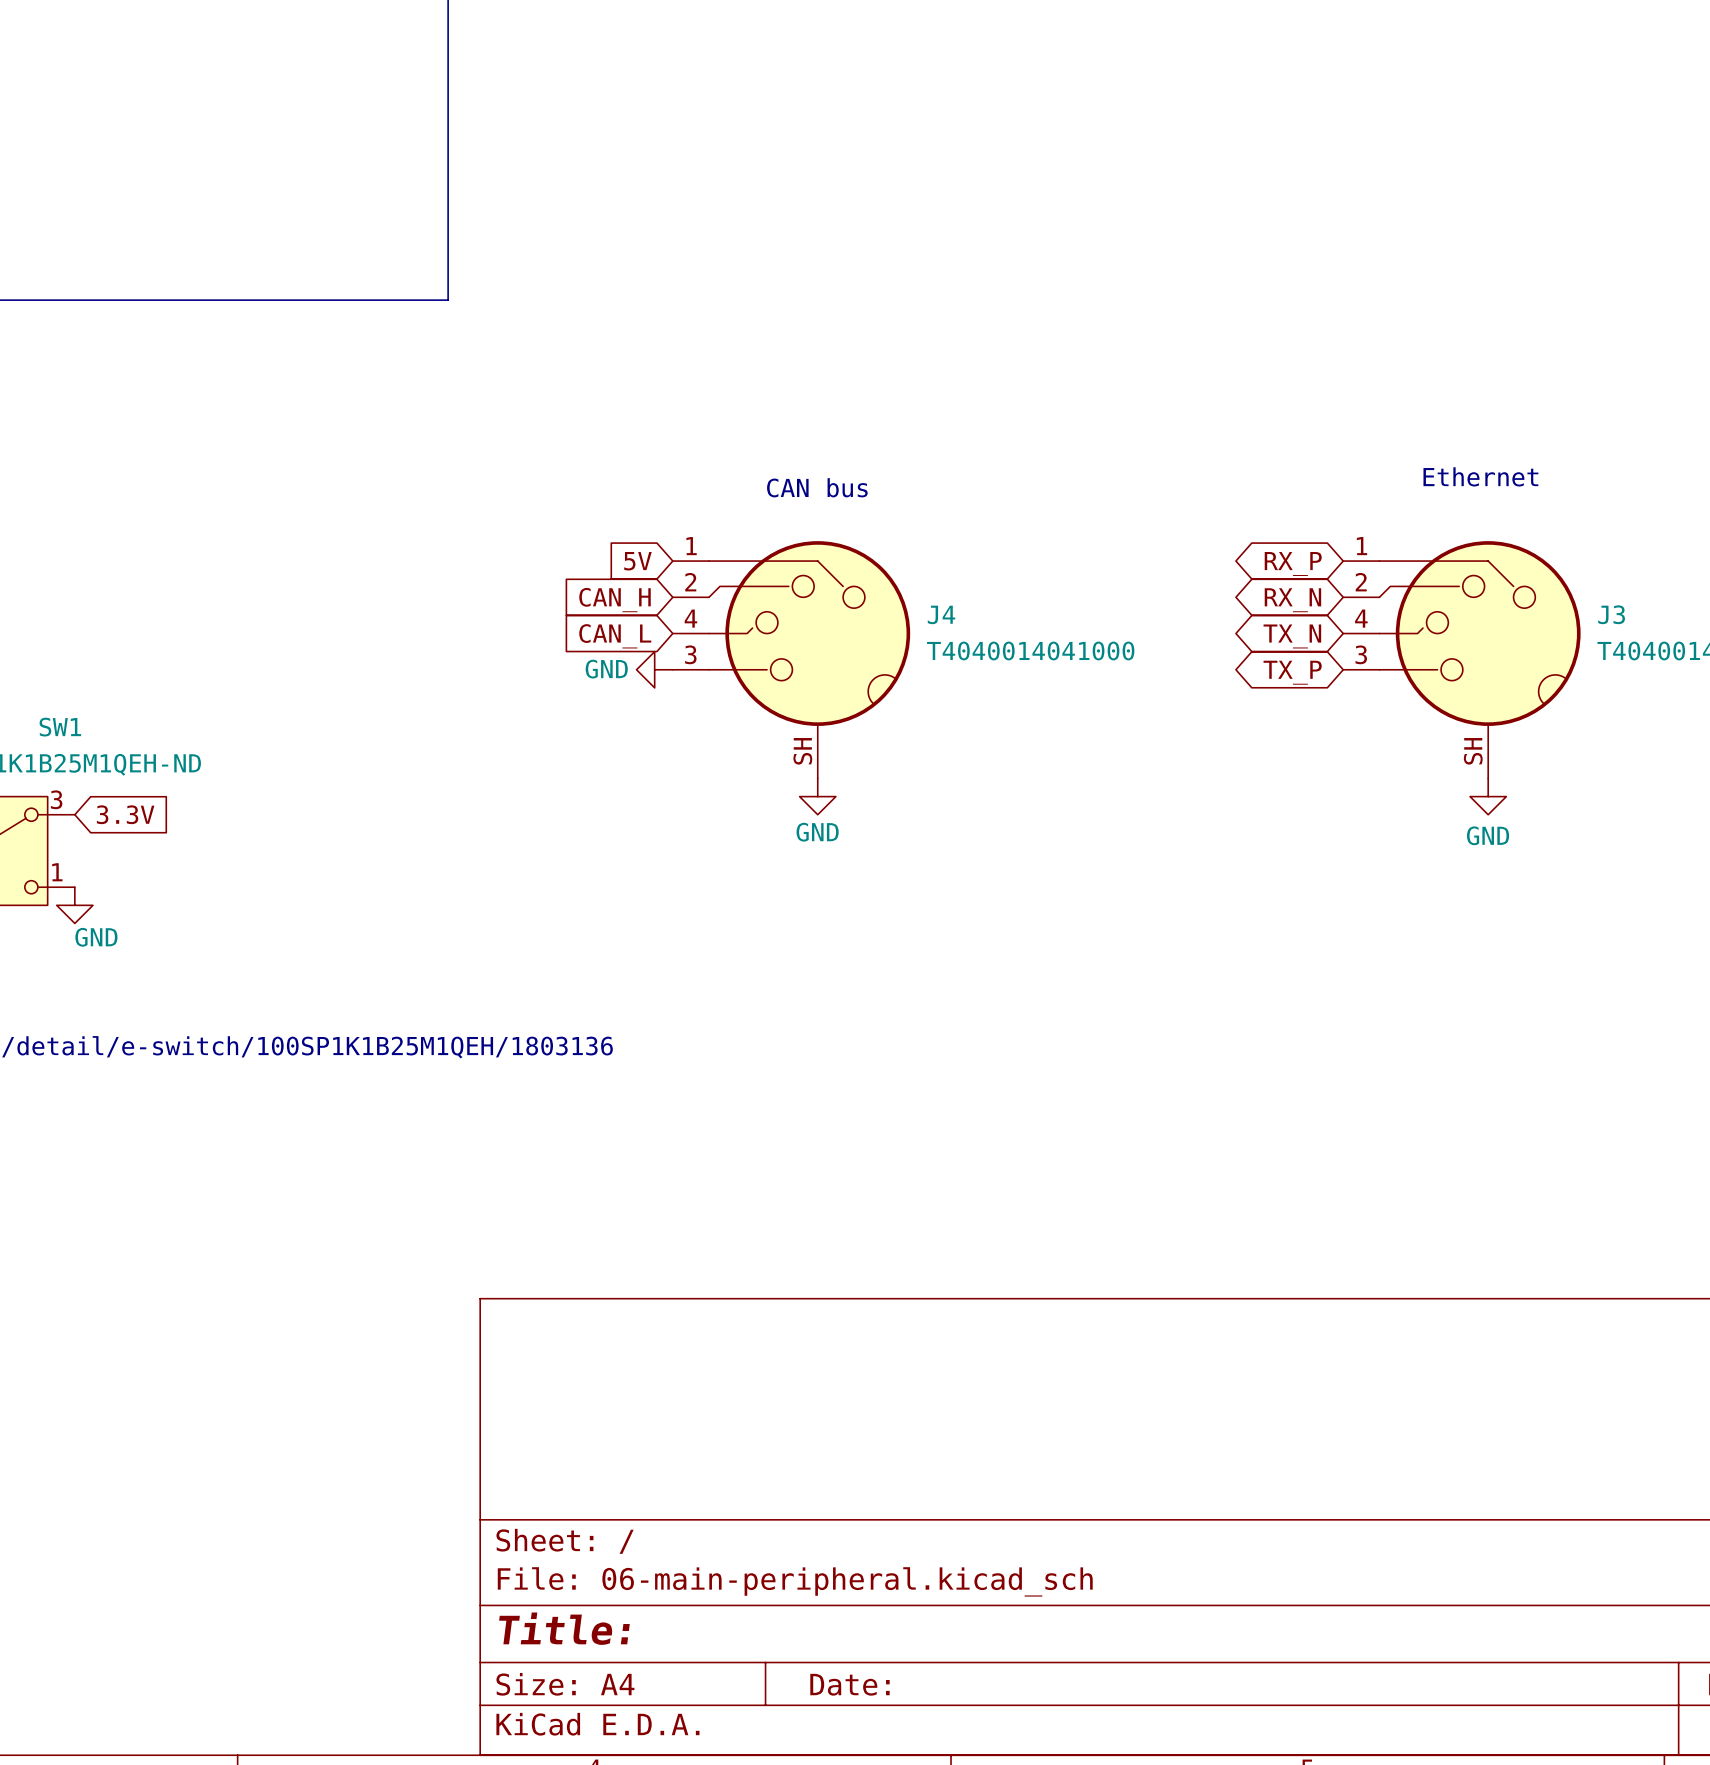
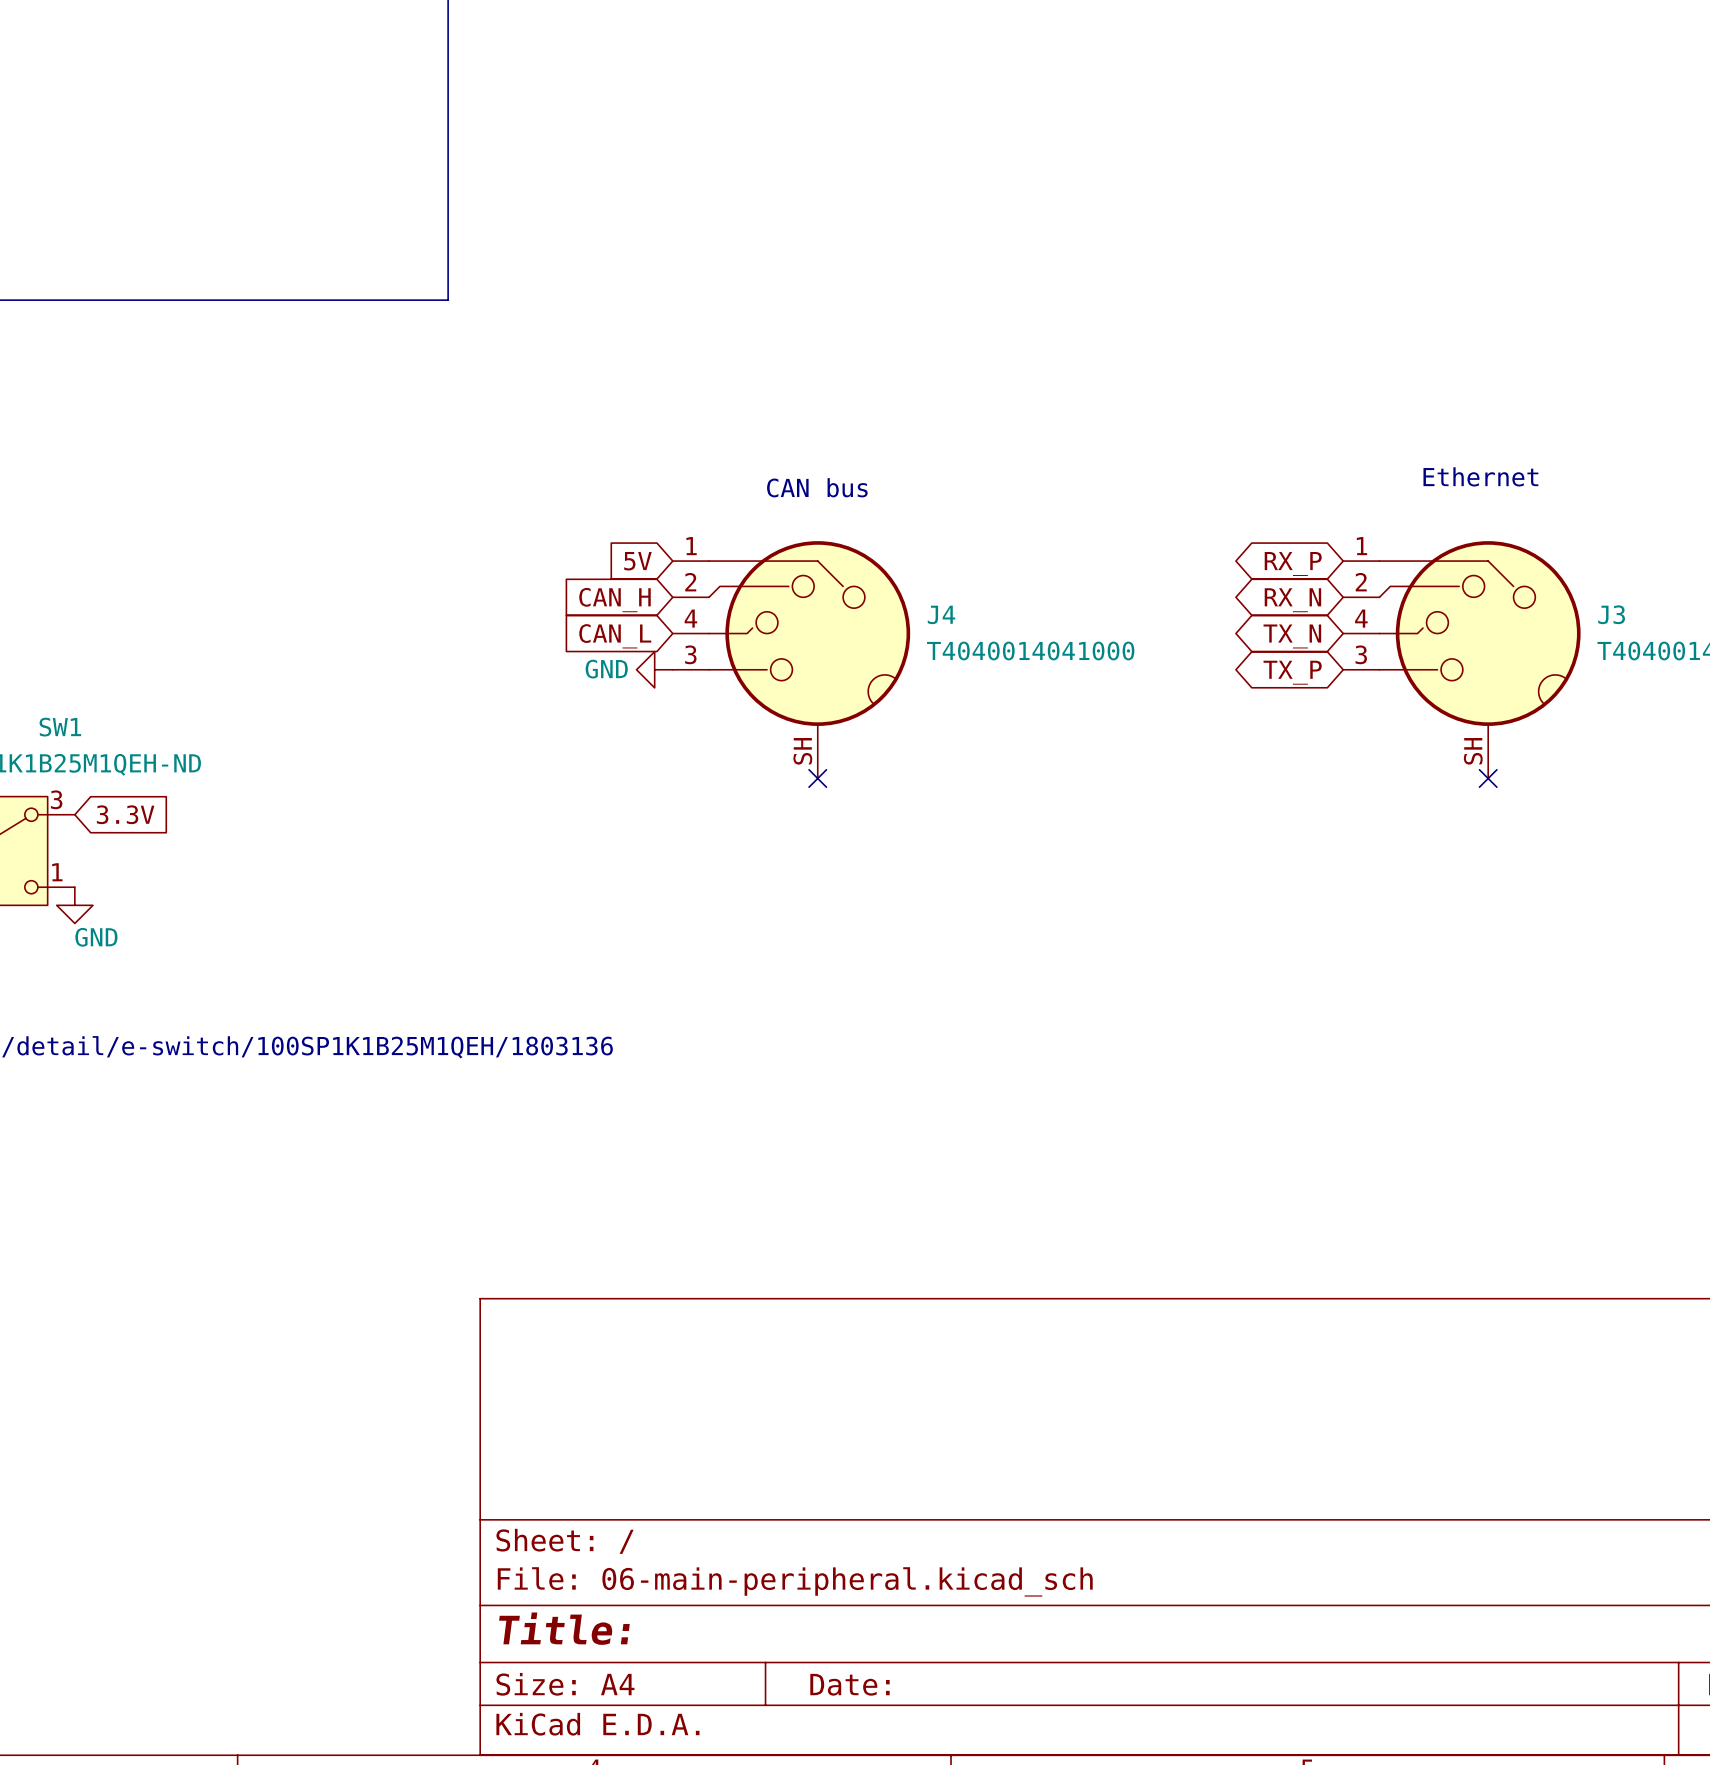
no-connect mark: none -> (817, 778)
no-connect mark: none -> (1488, 778)
power symbol: GND (817, 796) -> none
power symbol: GND (1488, 796) -> none

